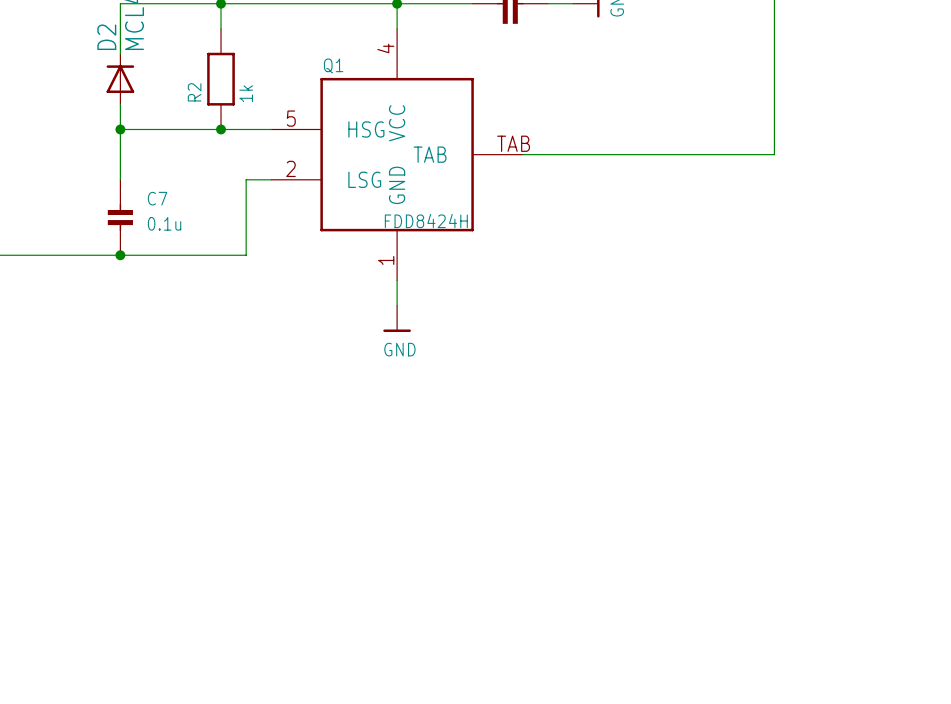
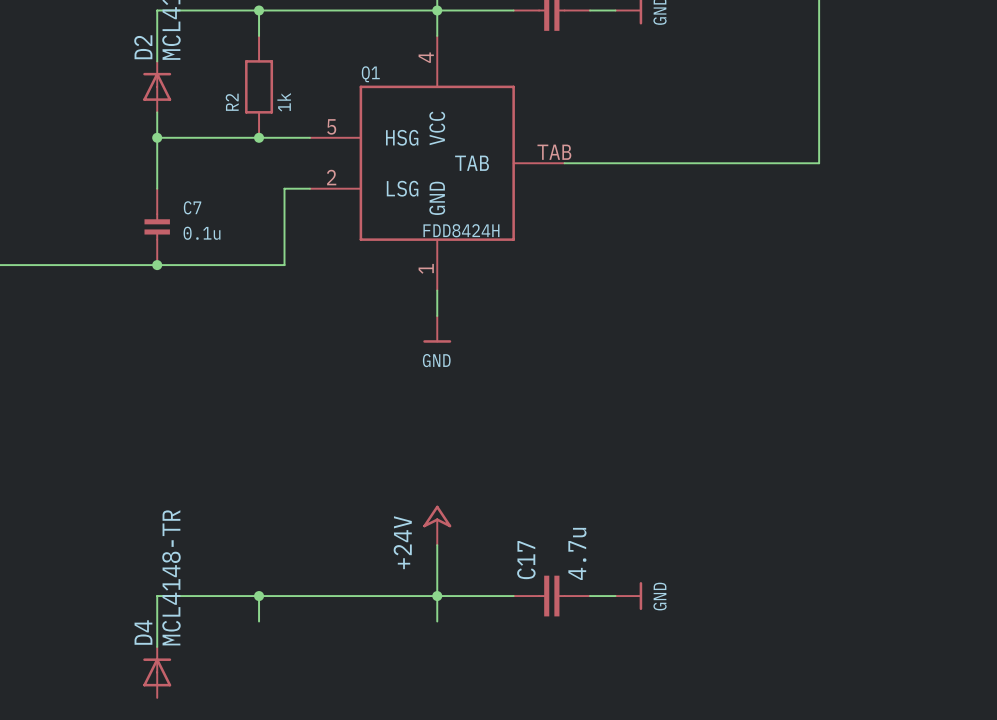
power symbol: none -> +24V (437, 525)
wire: none -> (437, 545) (437, 621)
wire: none -> (259, 596) (259, 621)
junction: none -> (259, 596)
junction: none -> (437, 596)
wire: none -> (513, 596) (157, 596) (157, 646)
C17: none -> 4.7u (551, 596)
wire: none -> (590, 596) (615, 596)
power symbol: none -> GND (628, 596)
D4: none -> MCL4148-TR (157, 672)

